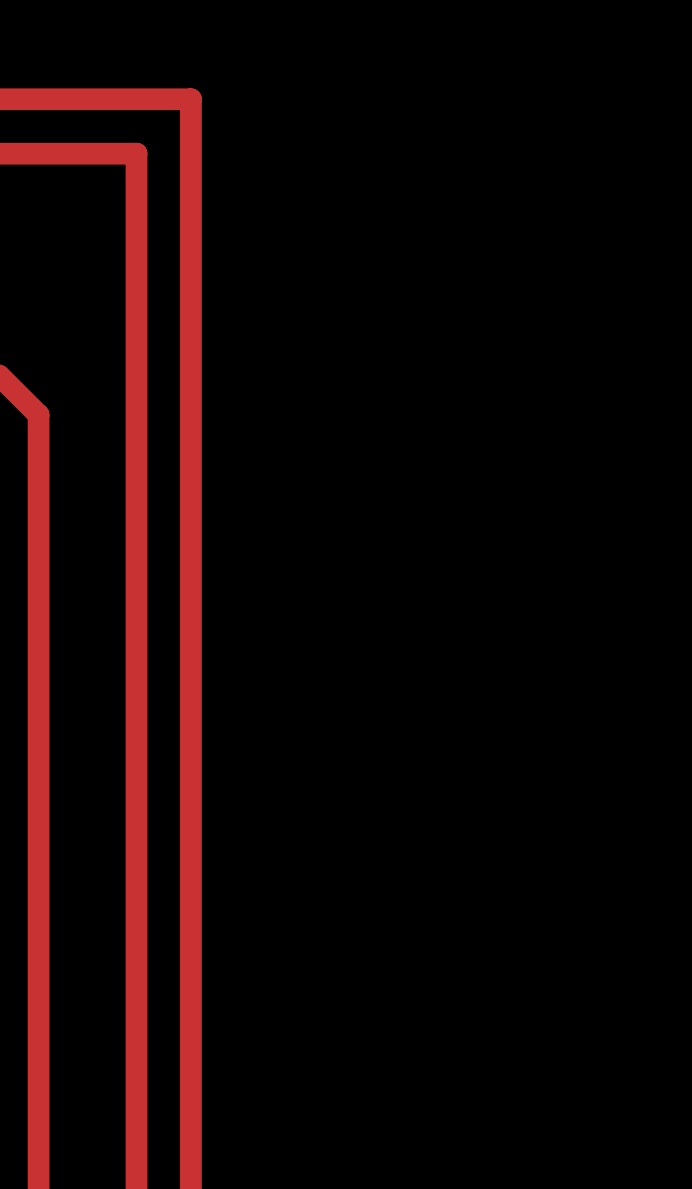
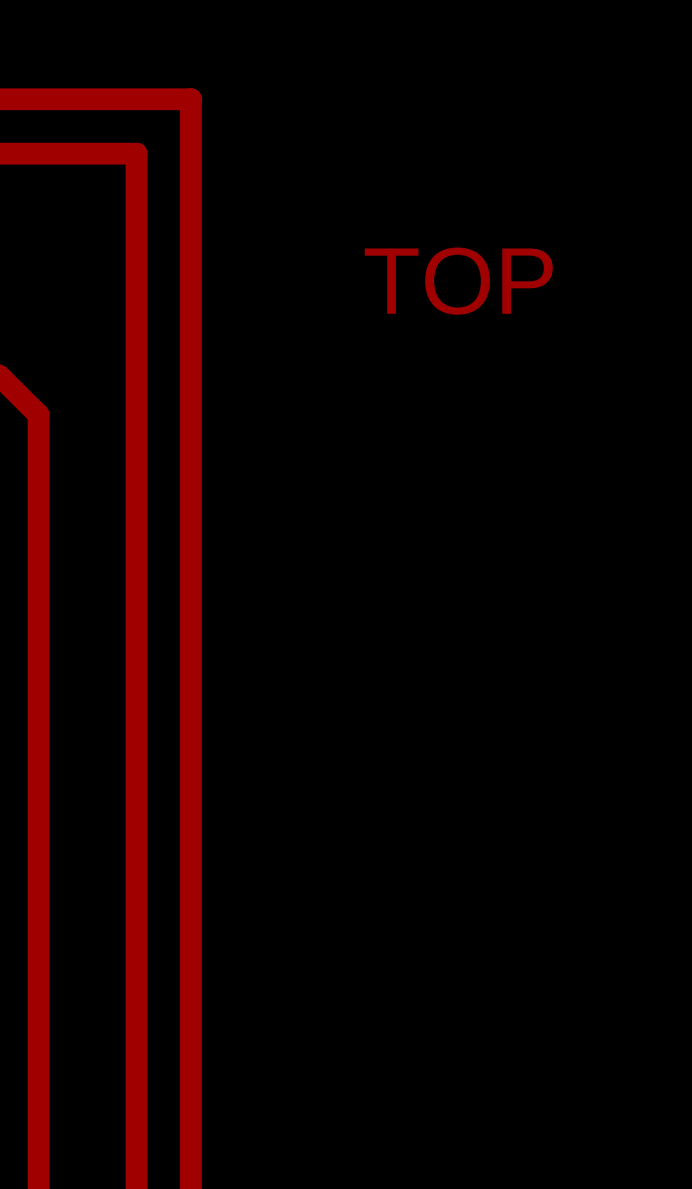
text: none -> TOP (458, 281)

